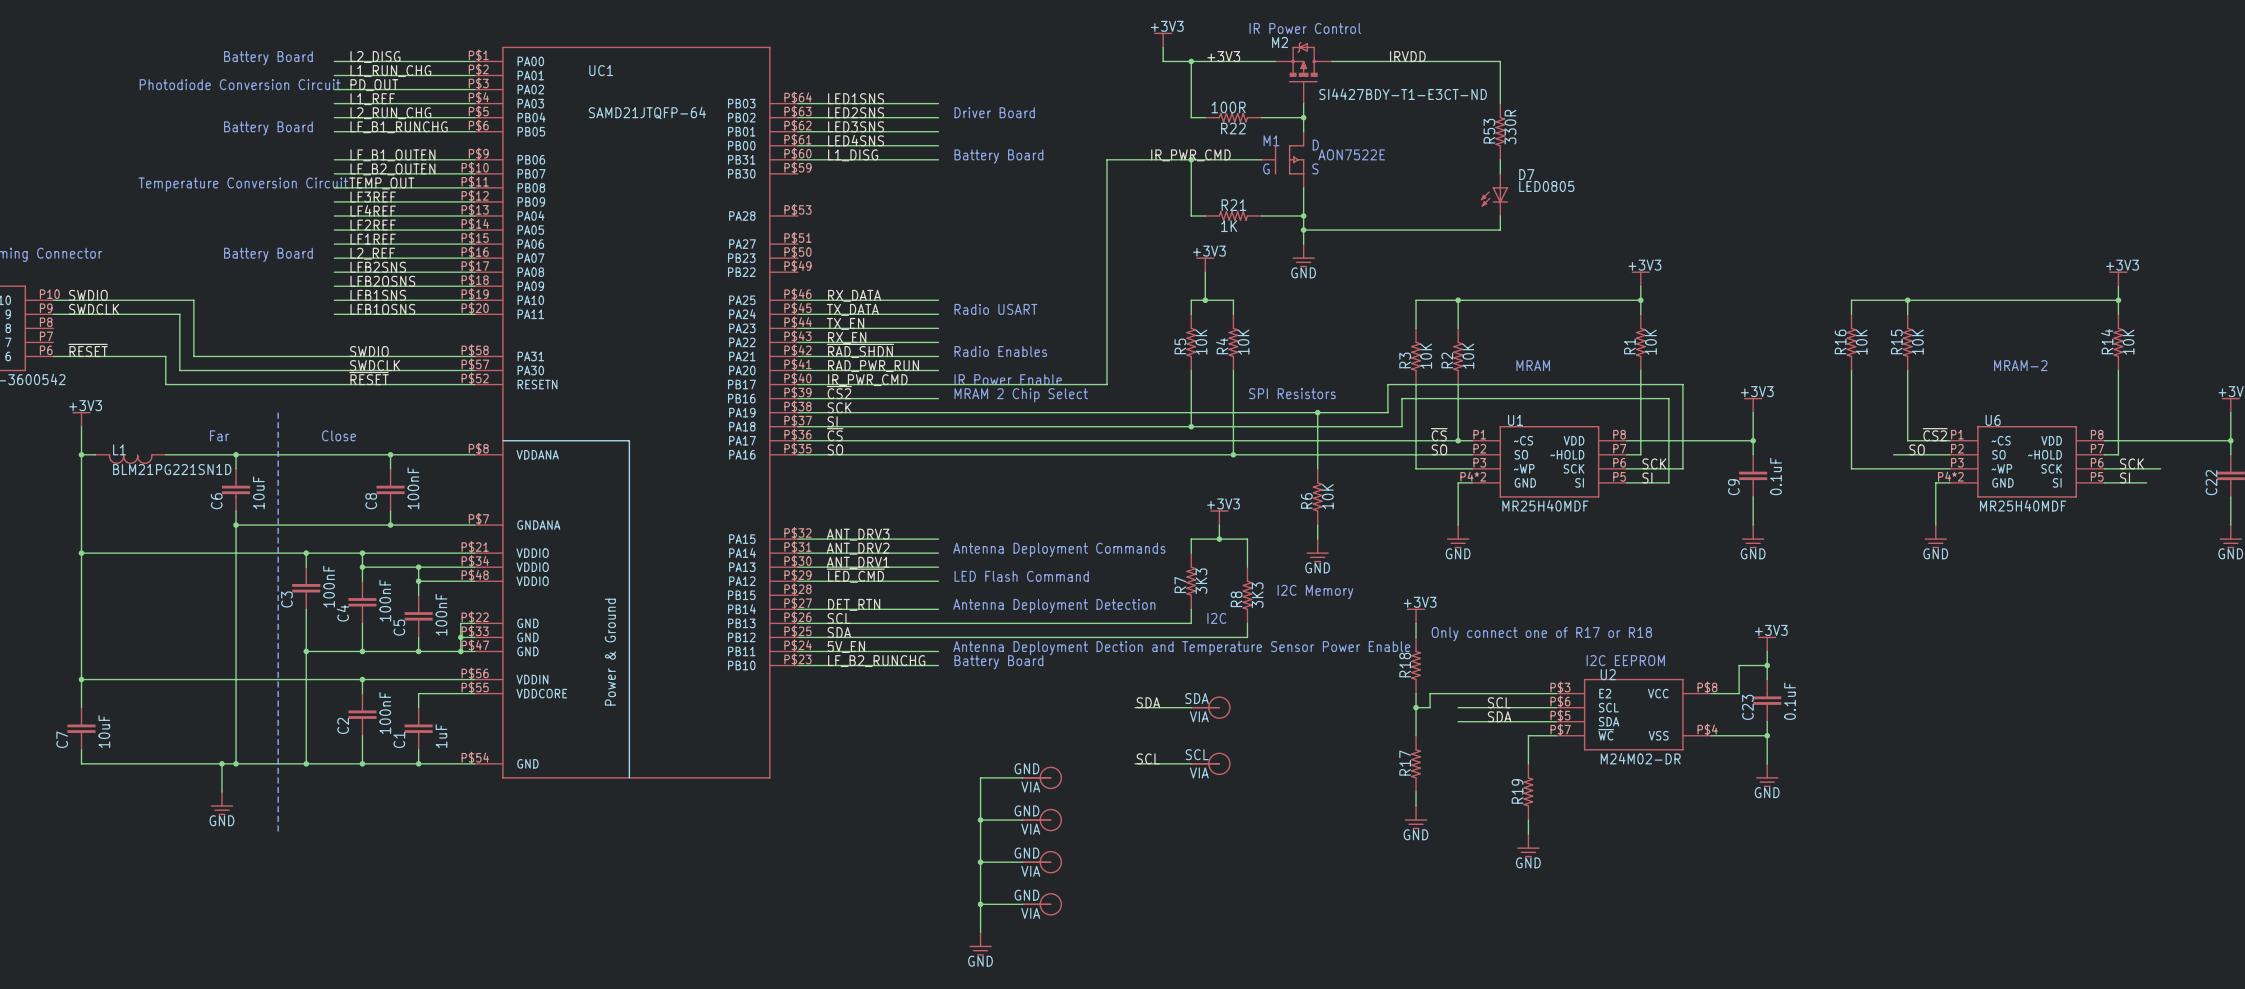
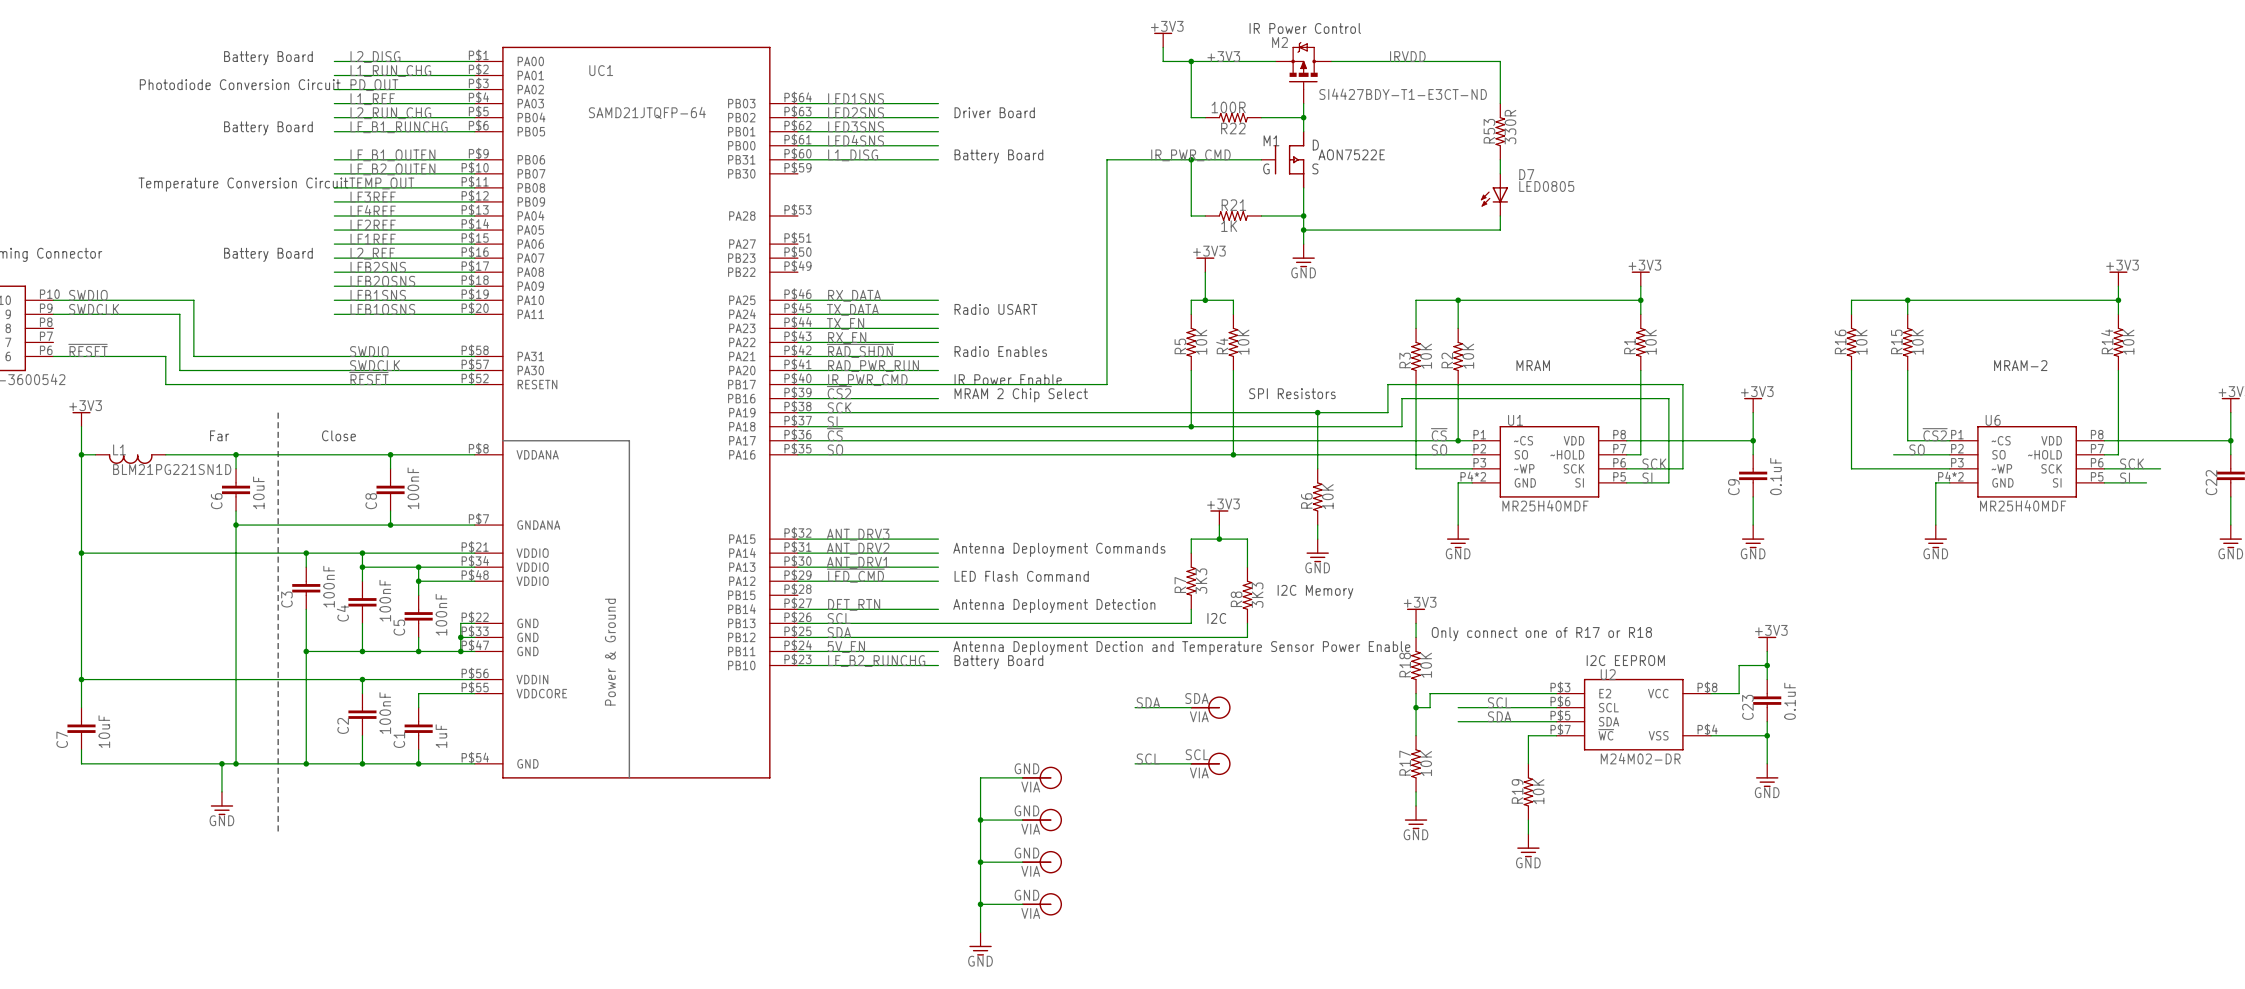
R18 value: none -> 10K (1426, 665)
R17 value: none -> 10K (1426, 763)
R19 value: none -> 10K (1538, 791)

